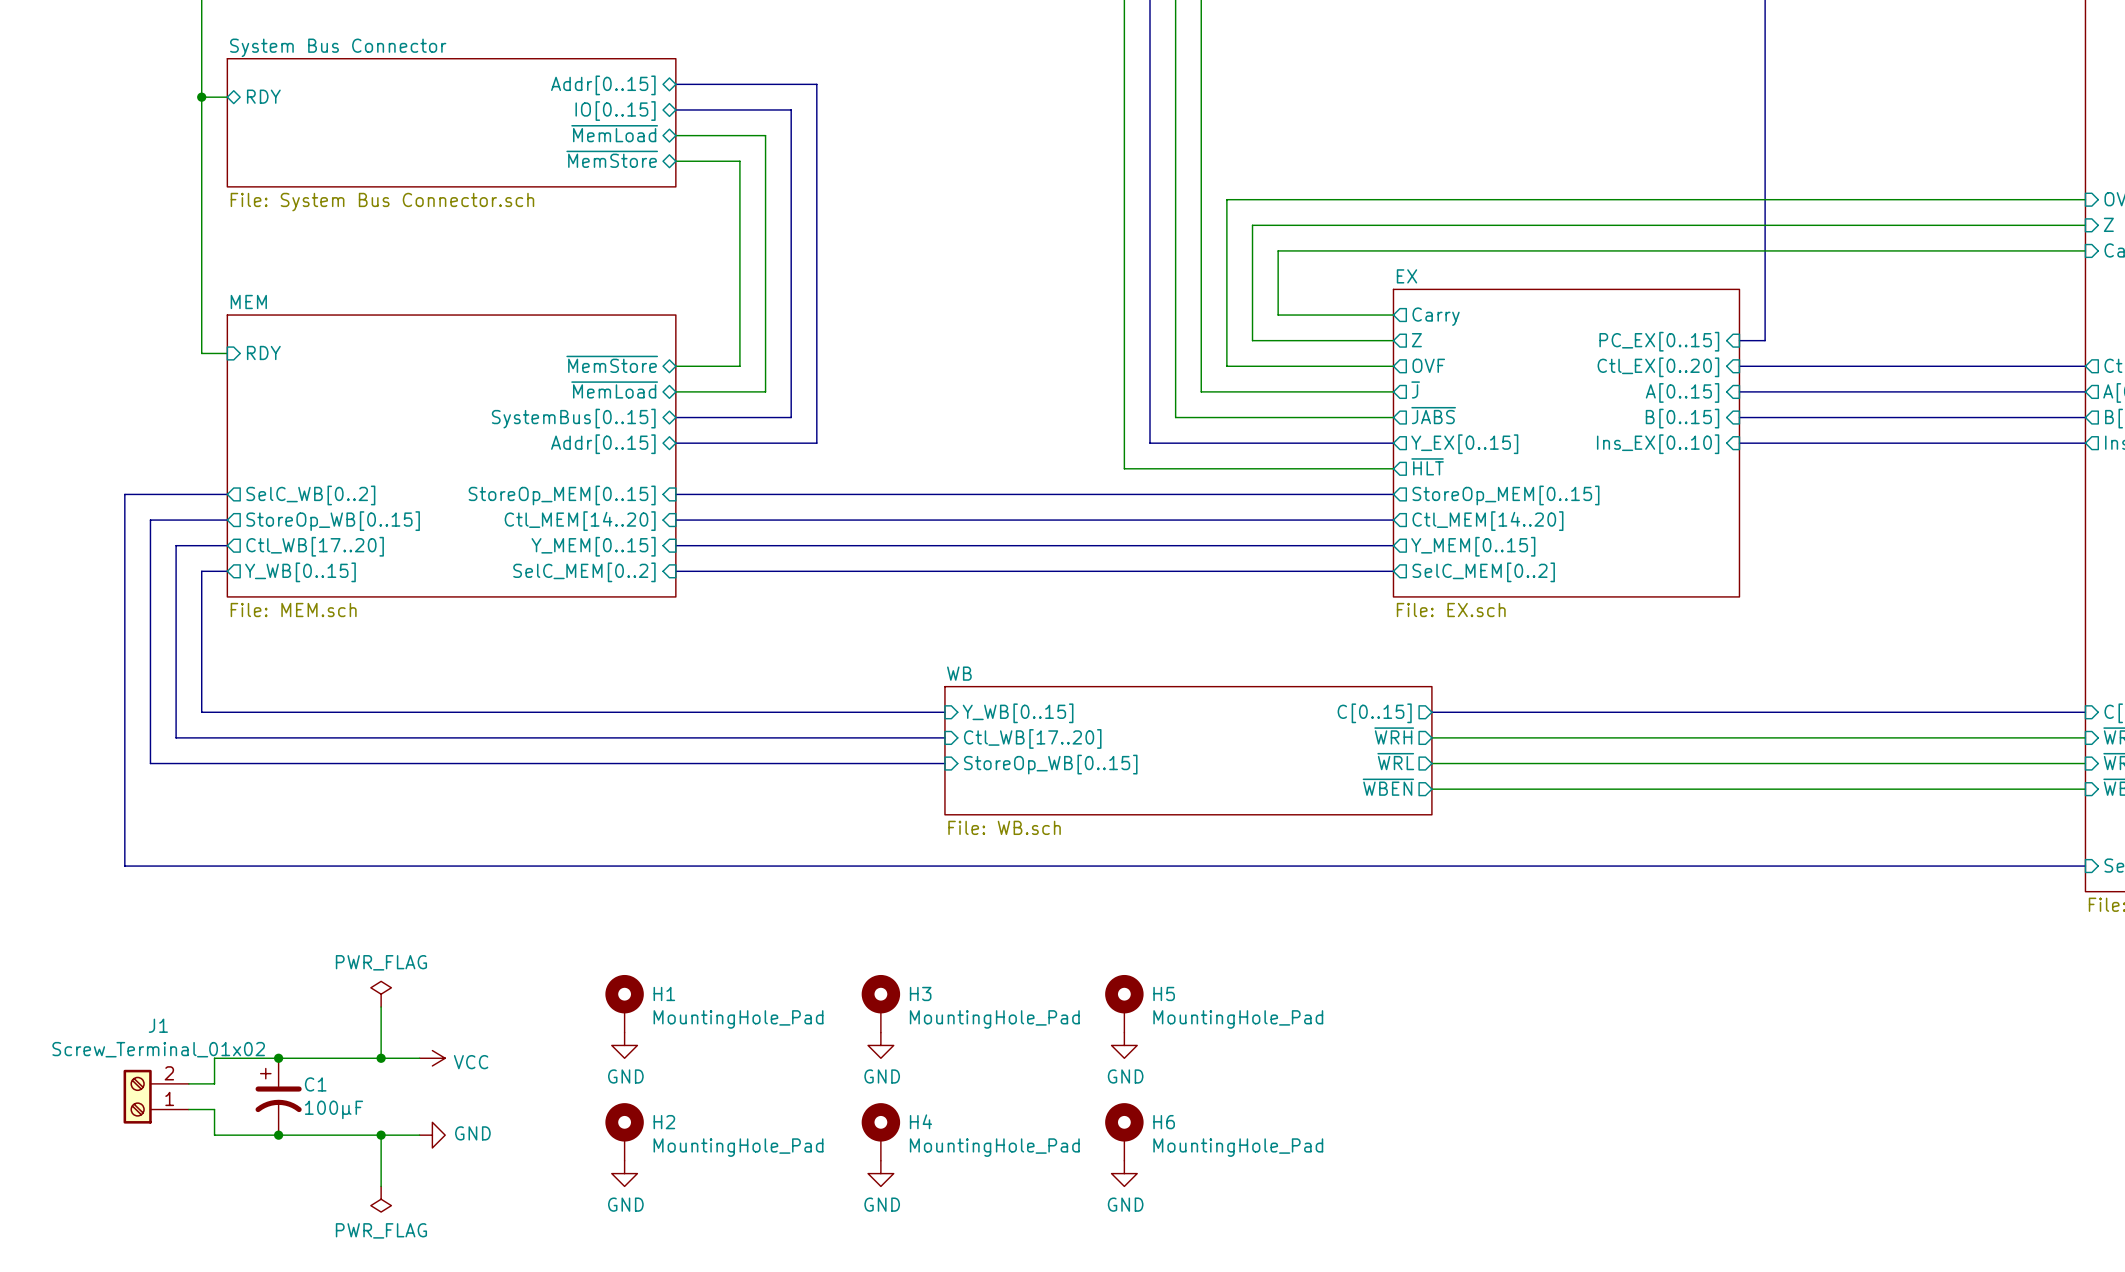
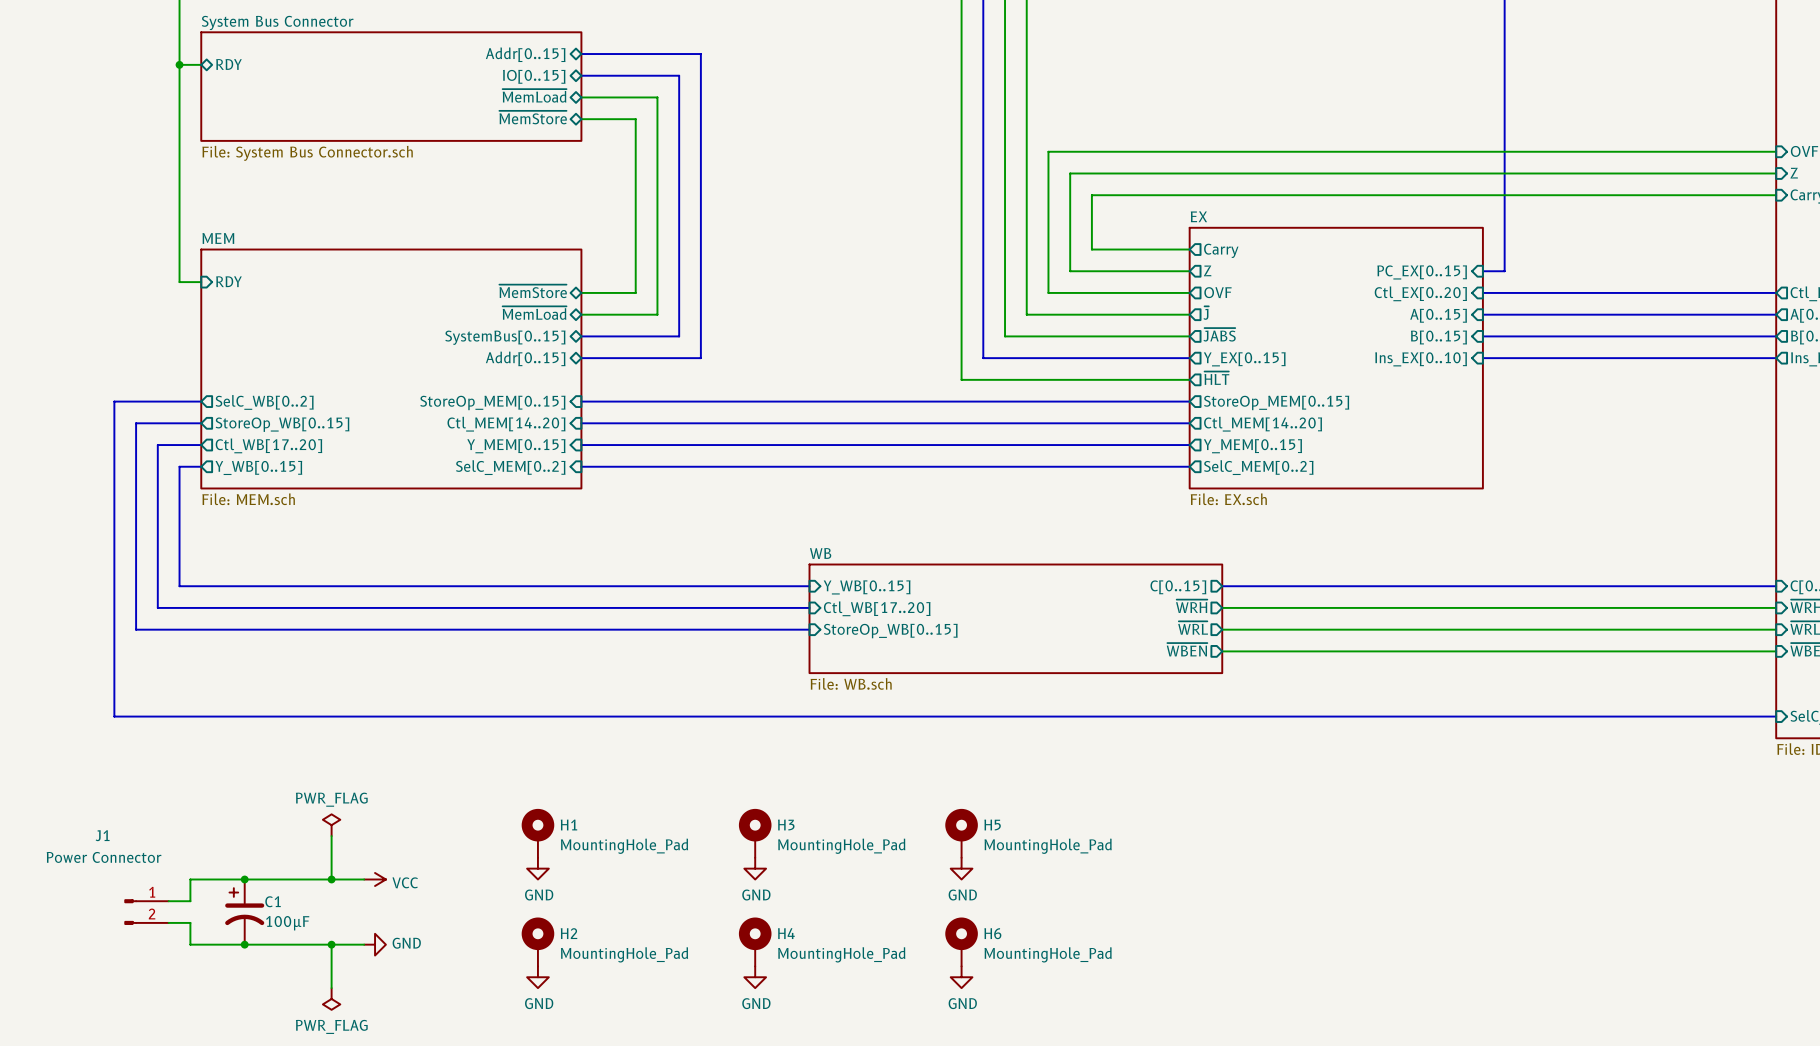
J1 name position: J1 (158, 1025) -> J1 (102, 835)
J1 value: Screw_Terminal_01x02 (158, 1049) -> Power Connector (104, 857)
J1 symbol: [123, 1069, 189, 1124] -> [124, 899, 169, 925]

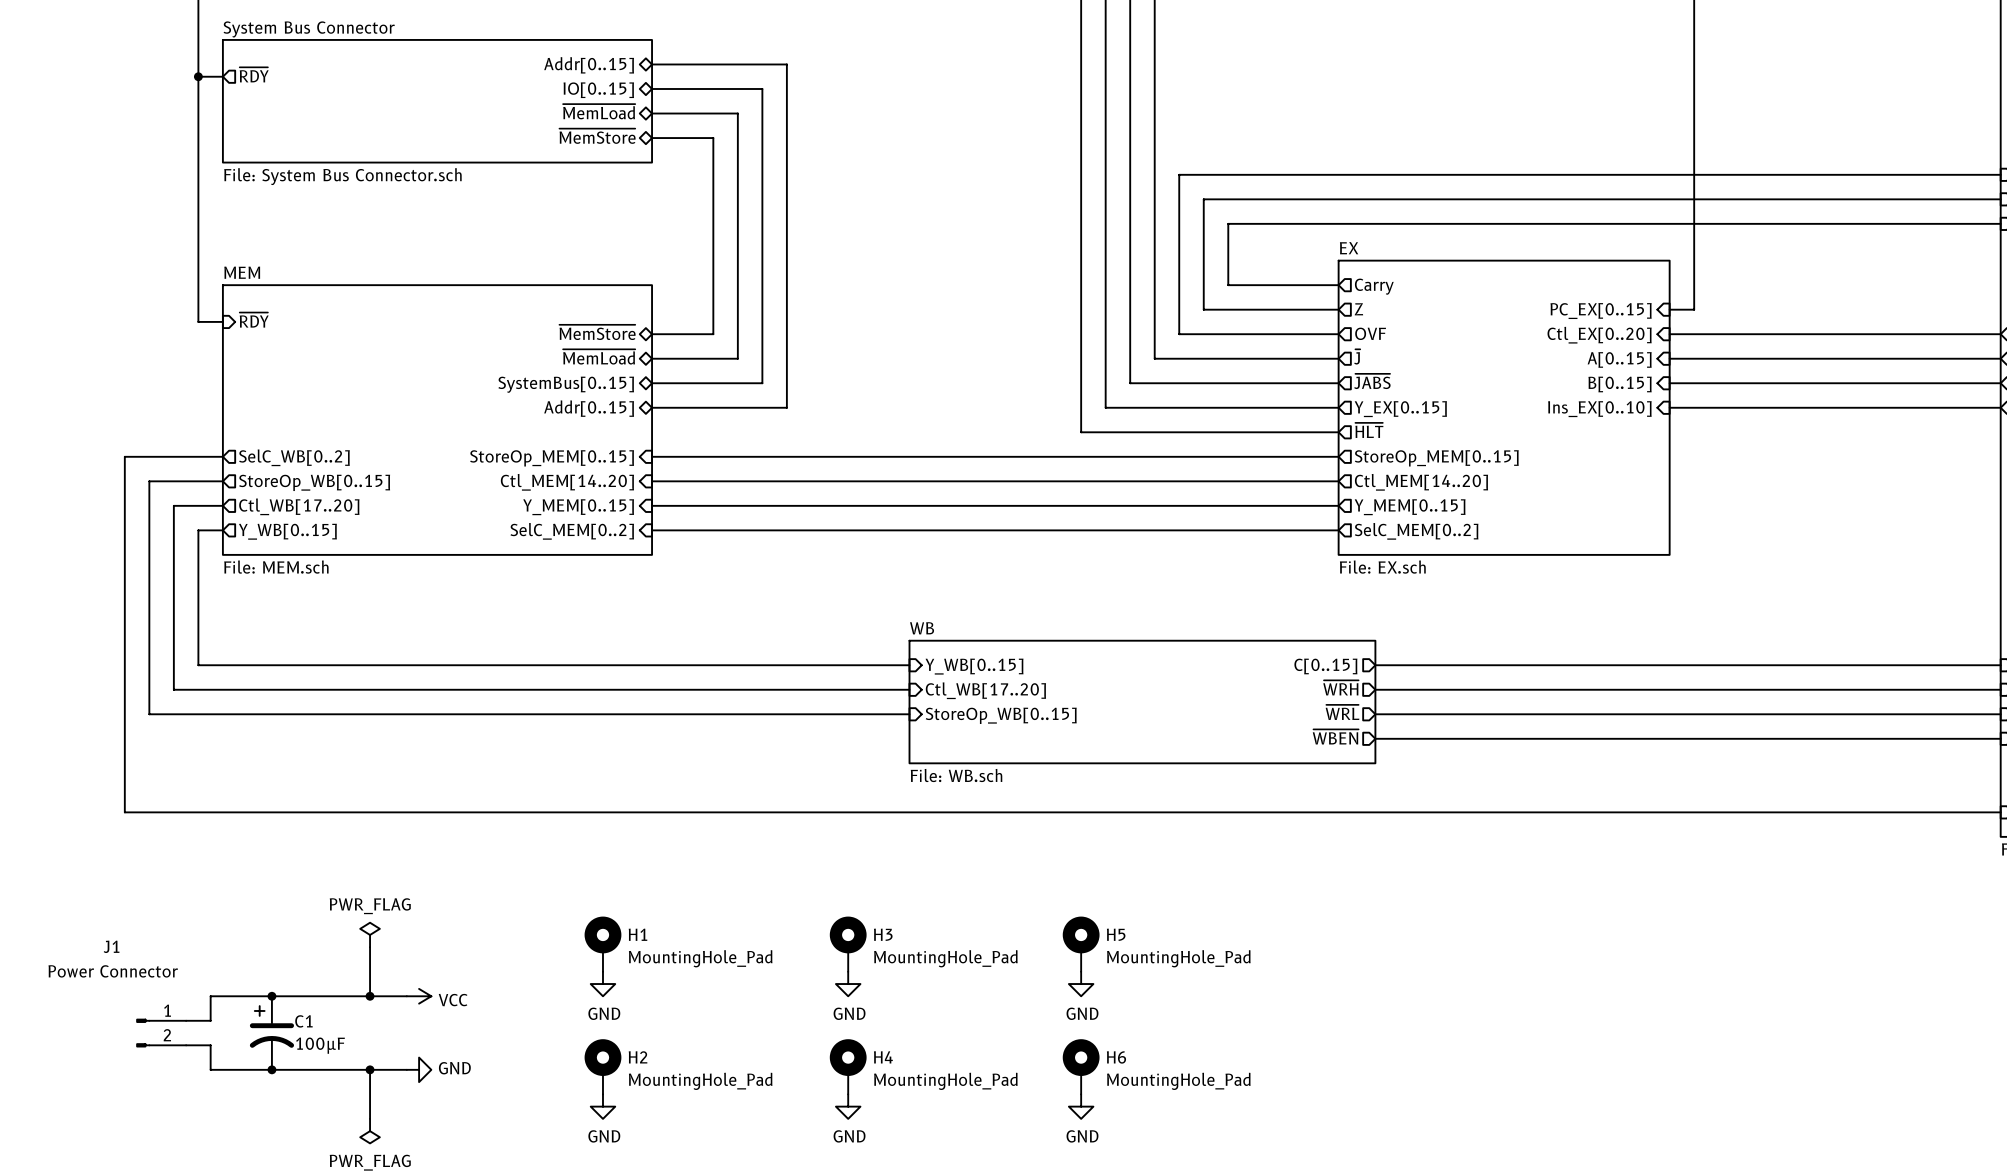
sheet pin shape: bidirectional (228, 64) -> output (254, 74)
sheet pin: RDY (228, 64) -> ~{RDY} (254, 74)
sheet pin: RDY (228, 281) -> ~{RDY} (254, 320)

